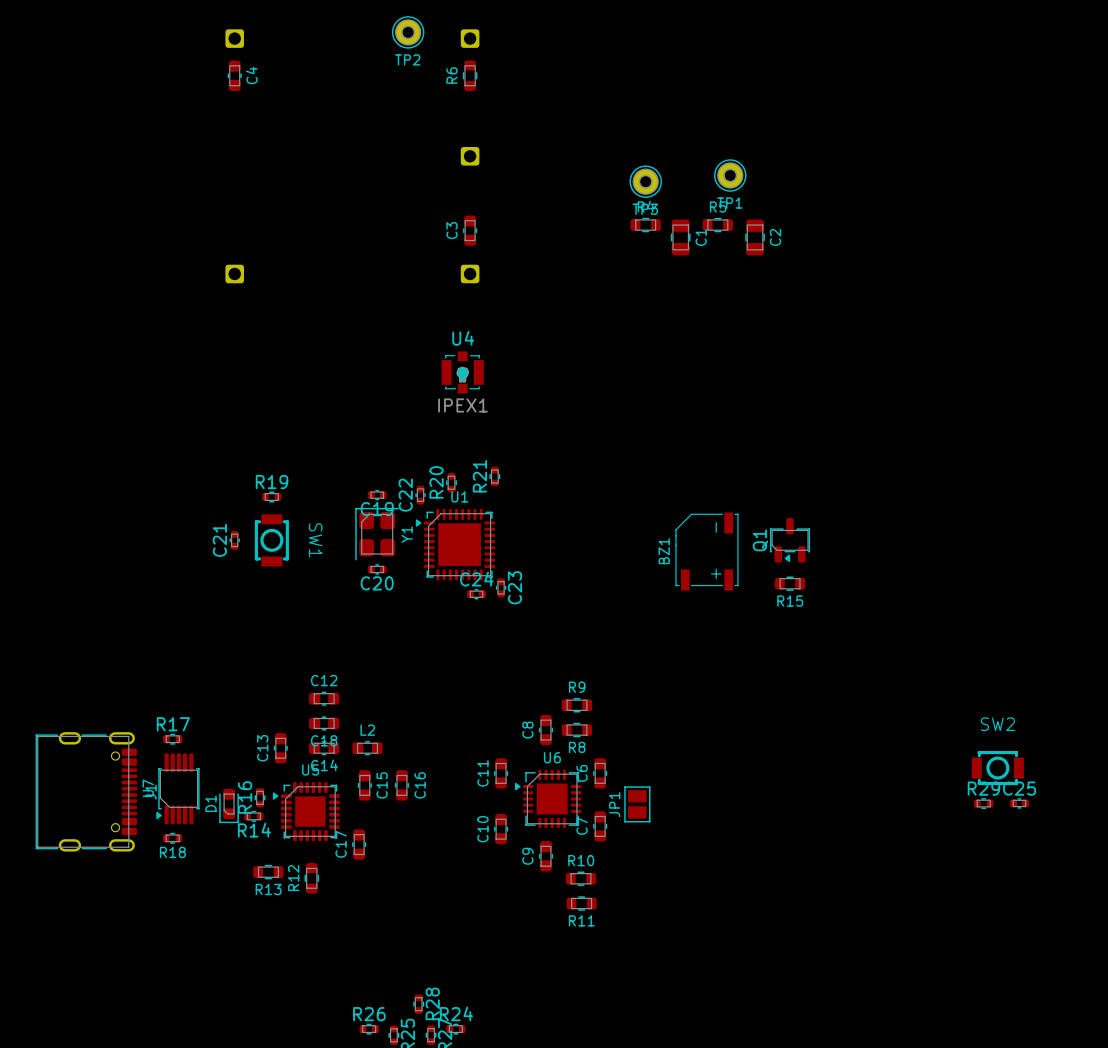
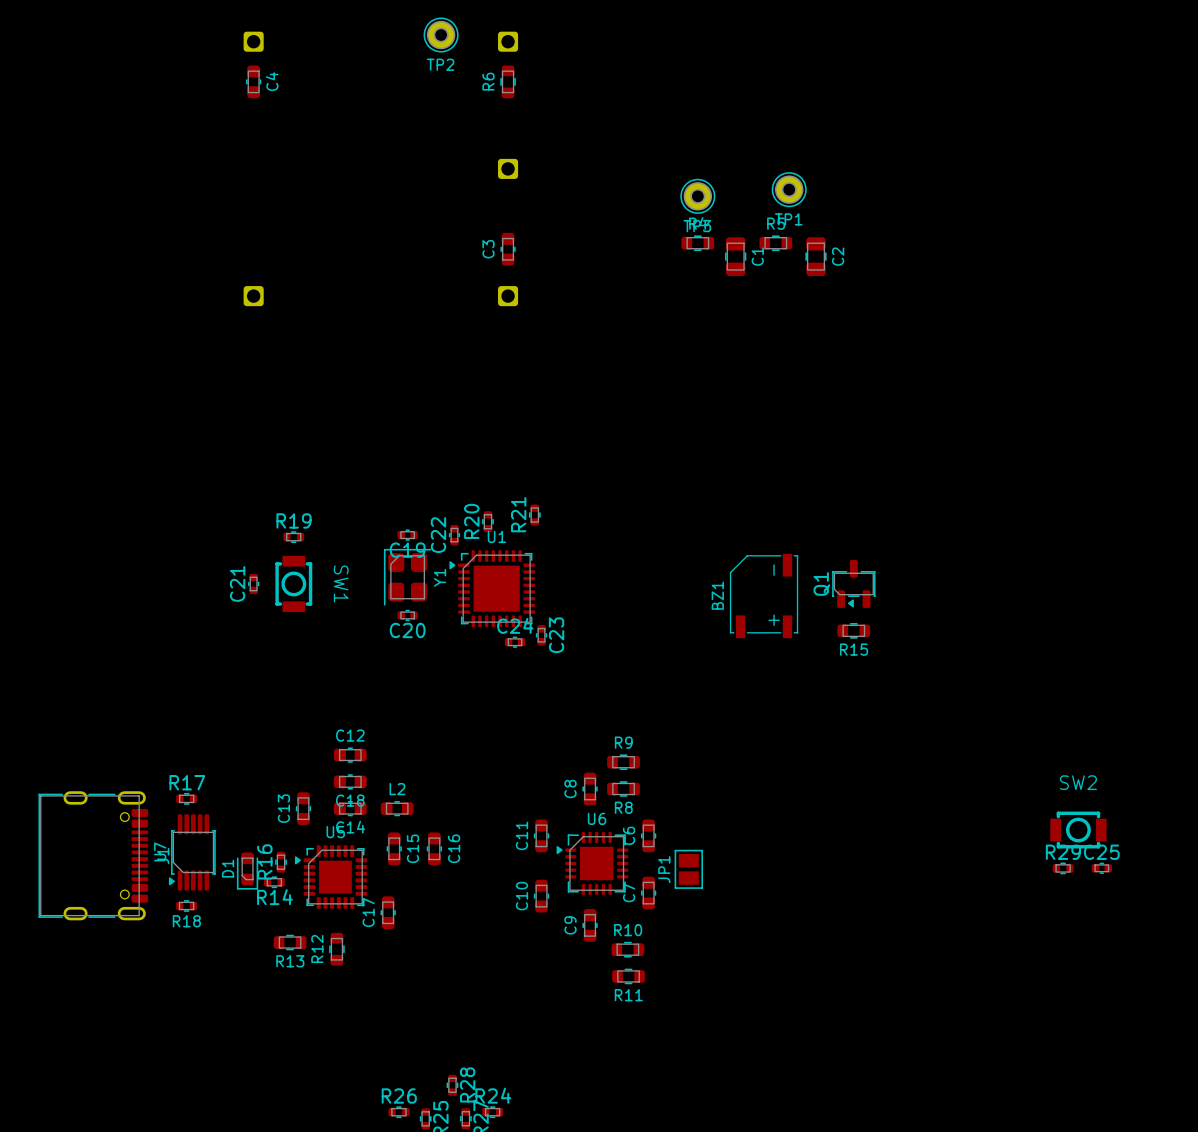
U4: IPEX1 (462, 372) -> none

